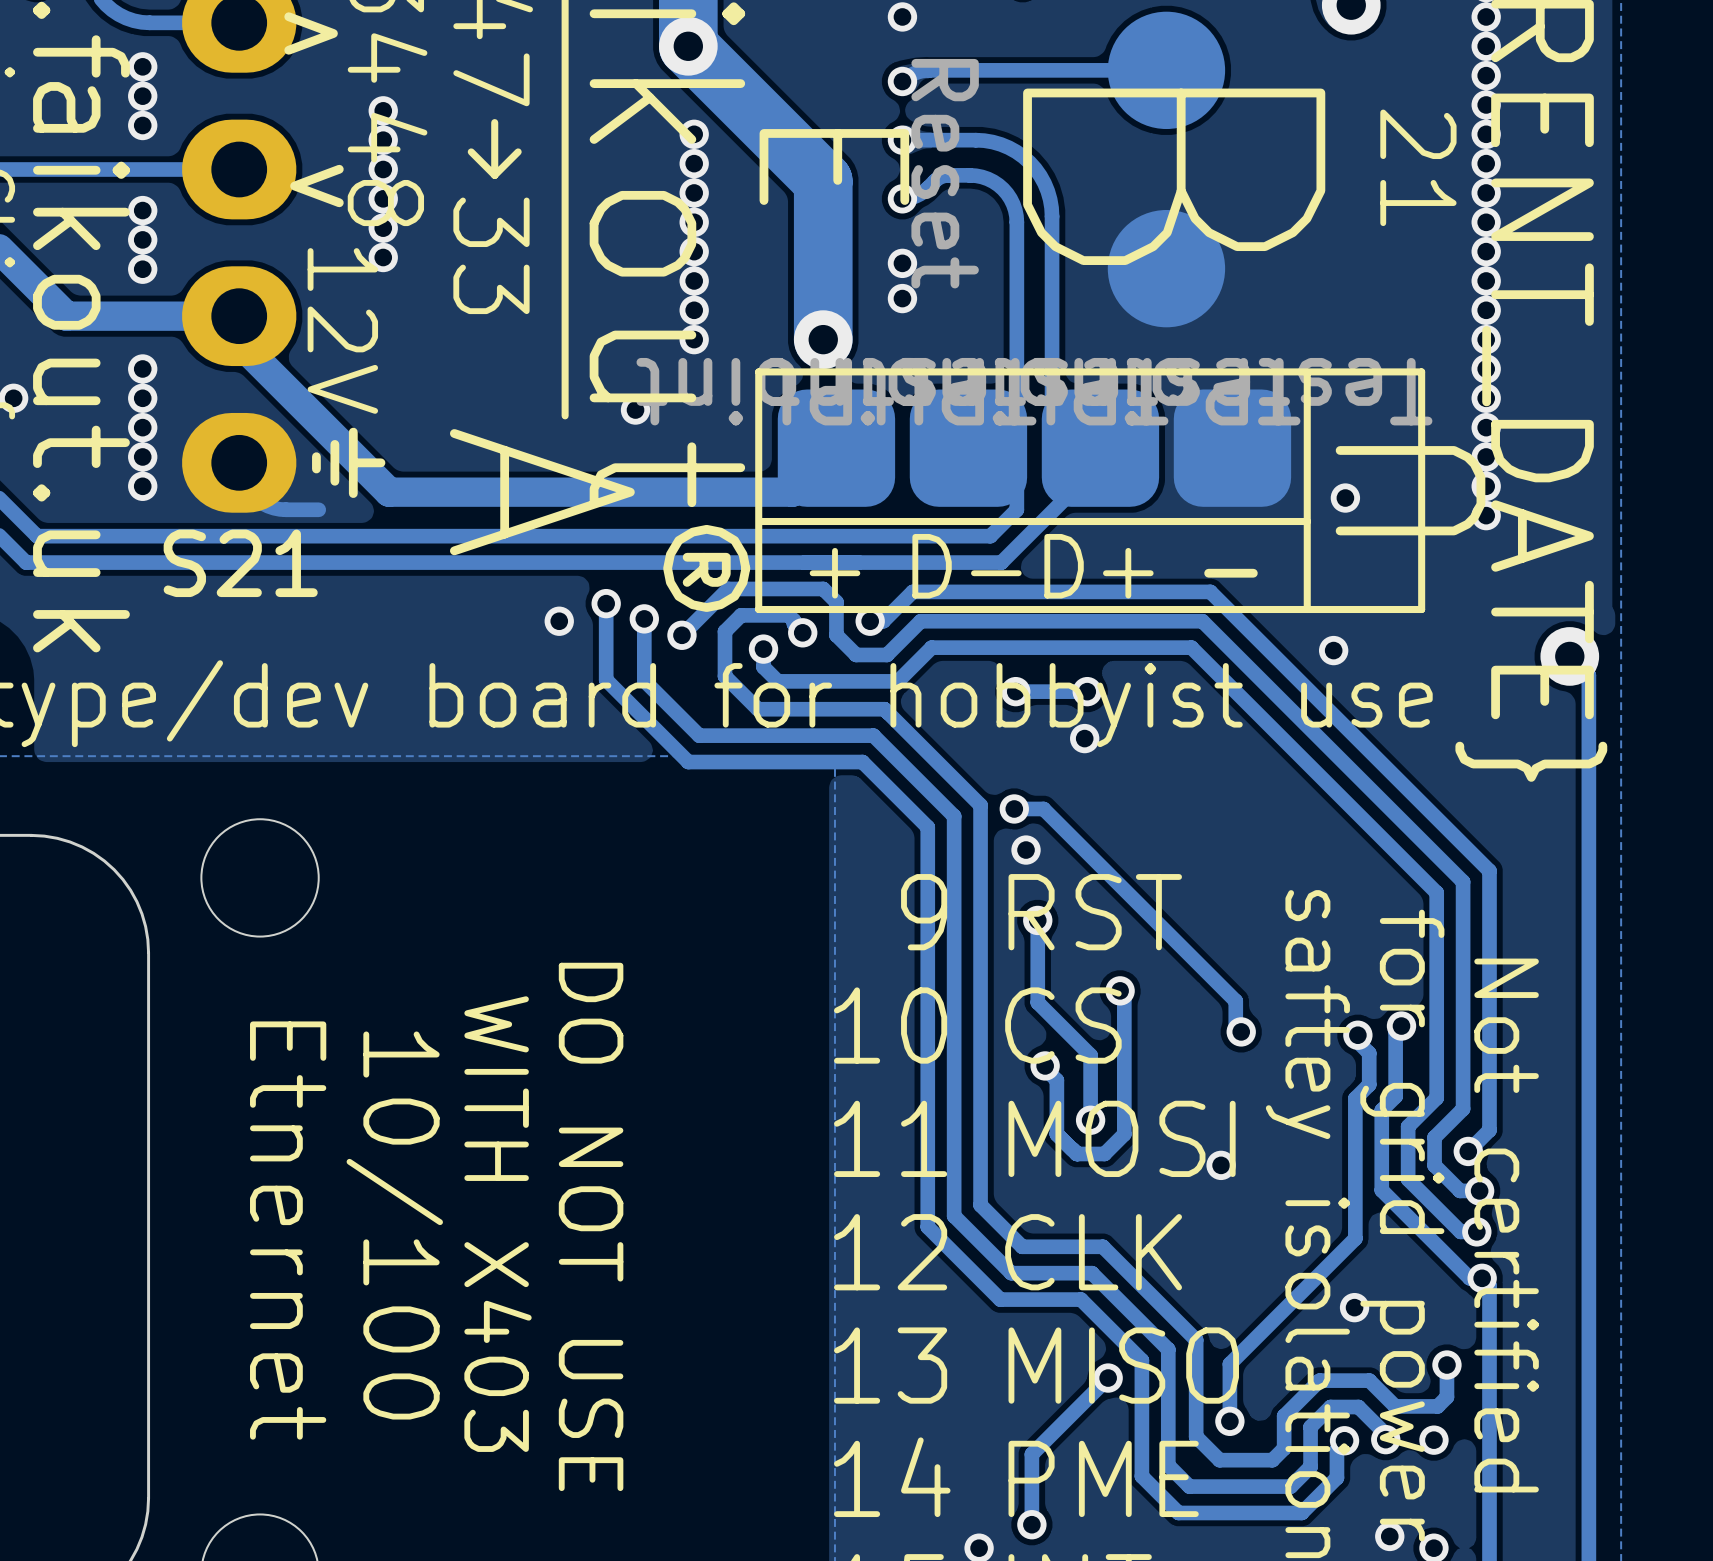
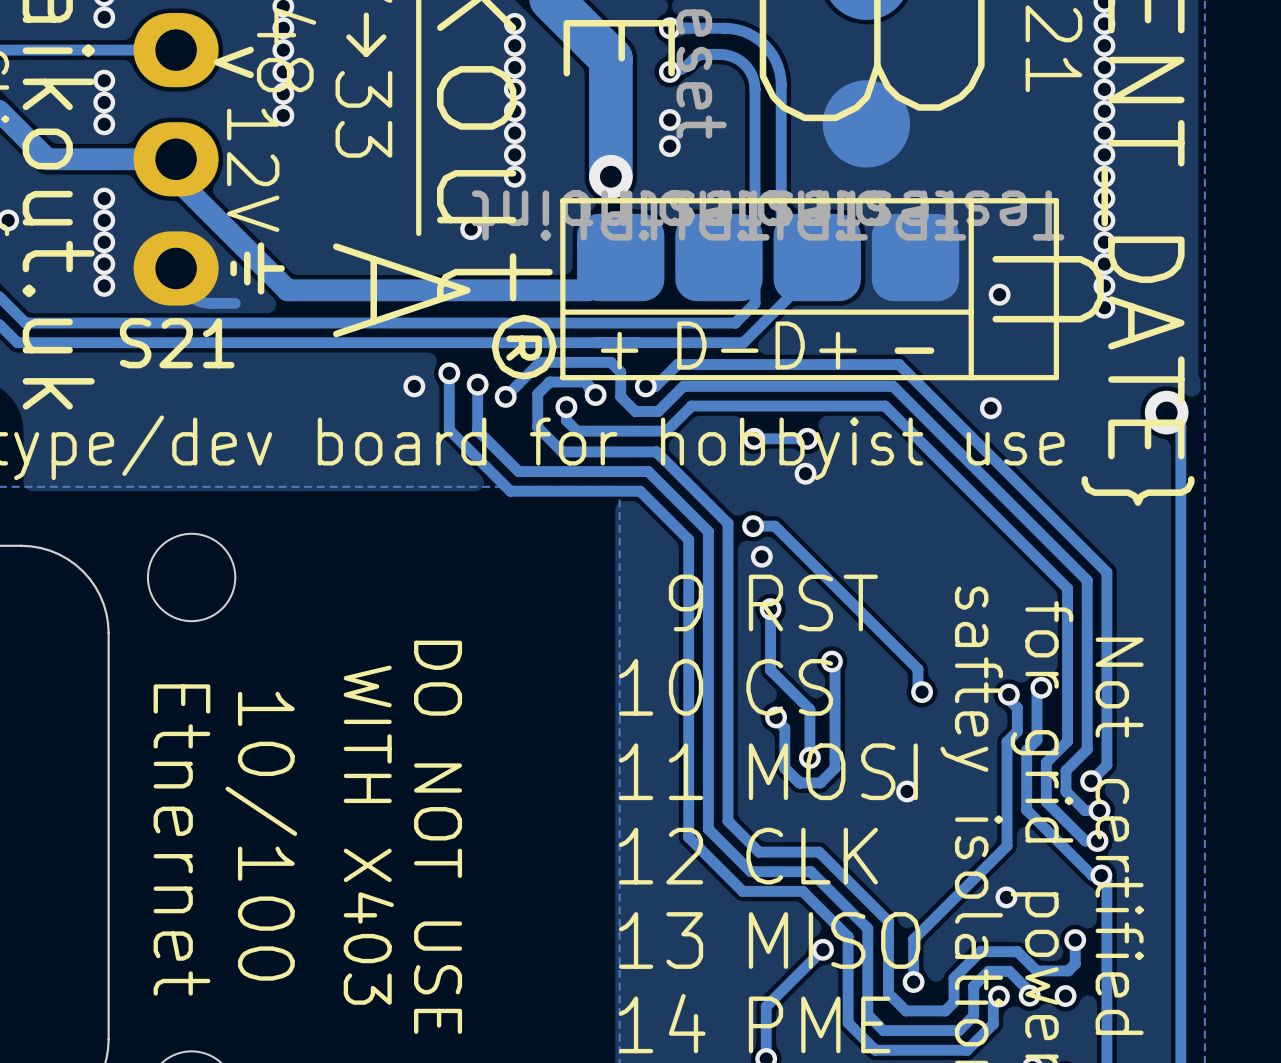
text position: 10/100 (394, 1225) -> 10/100 (261, 836)
text position: Etnernet (288, 1230) -> Etnernet (181, 839)

